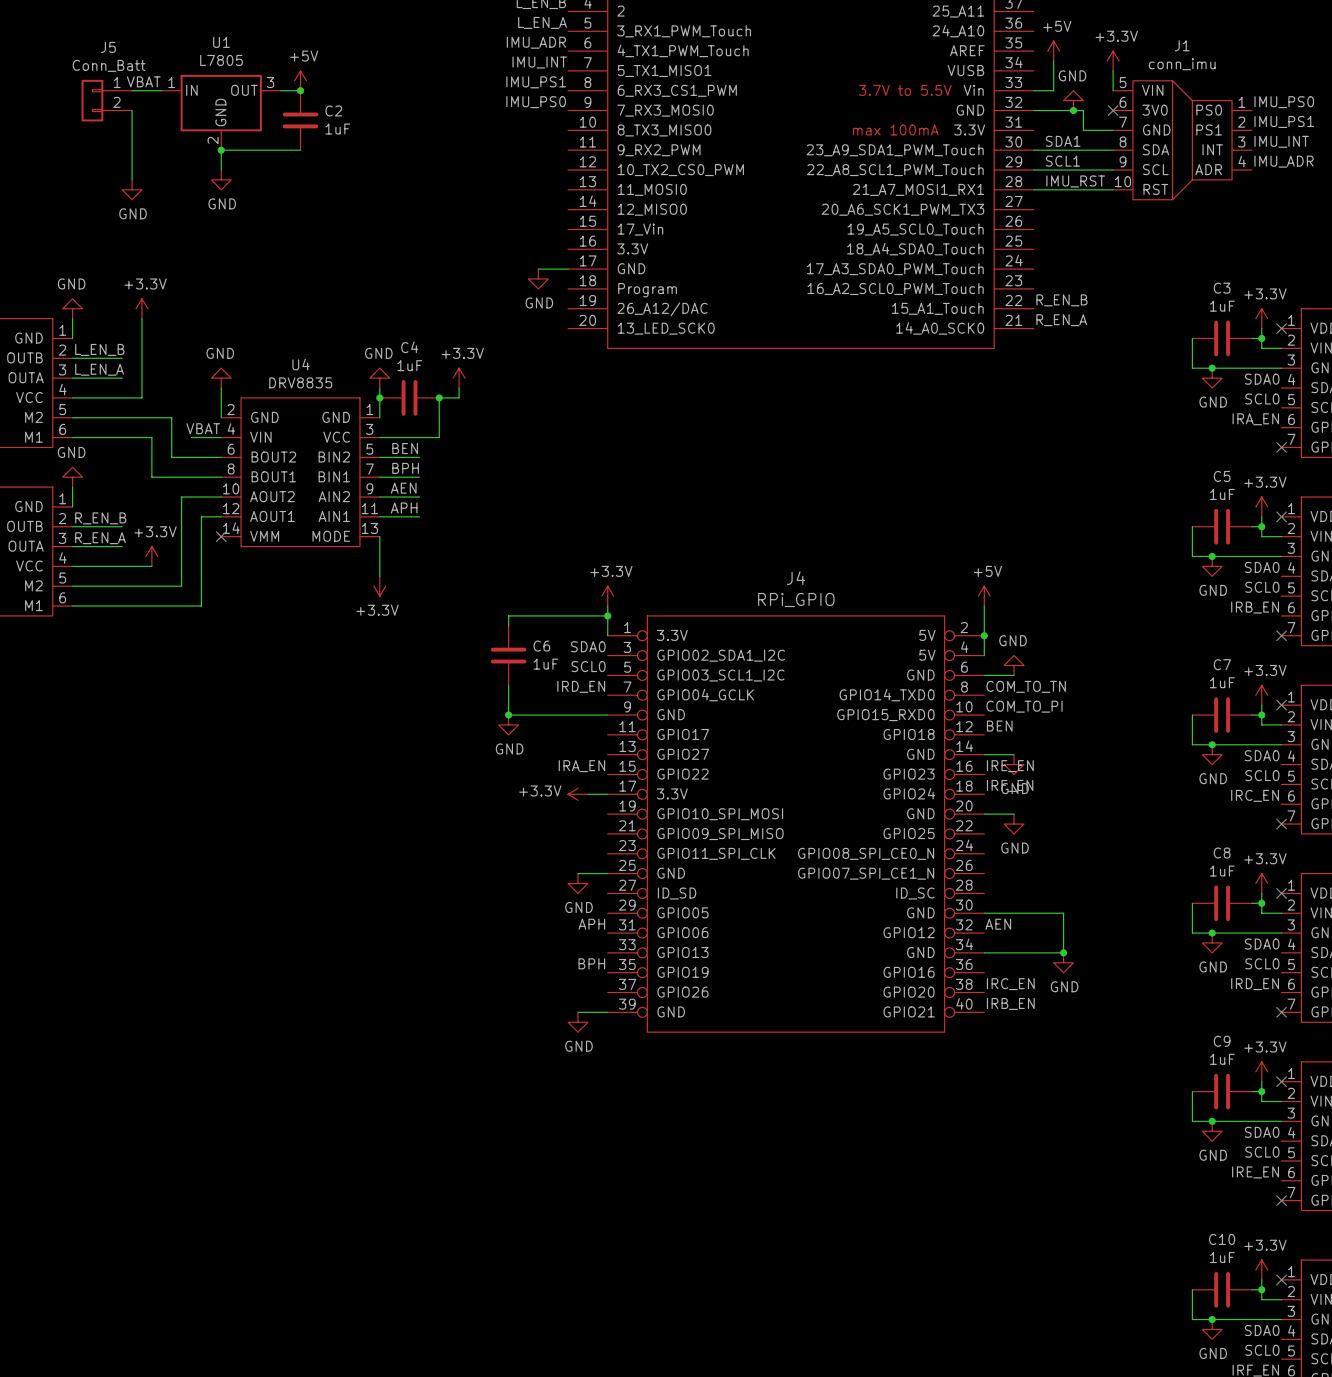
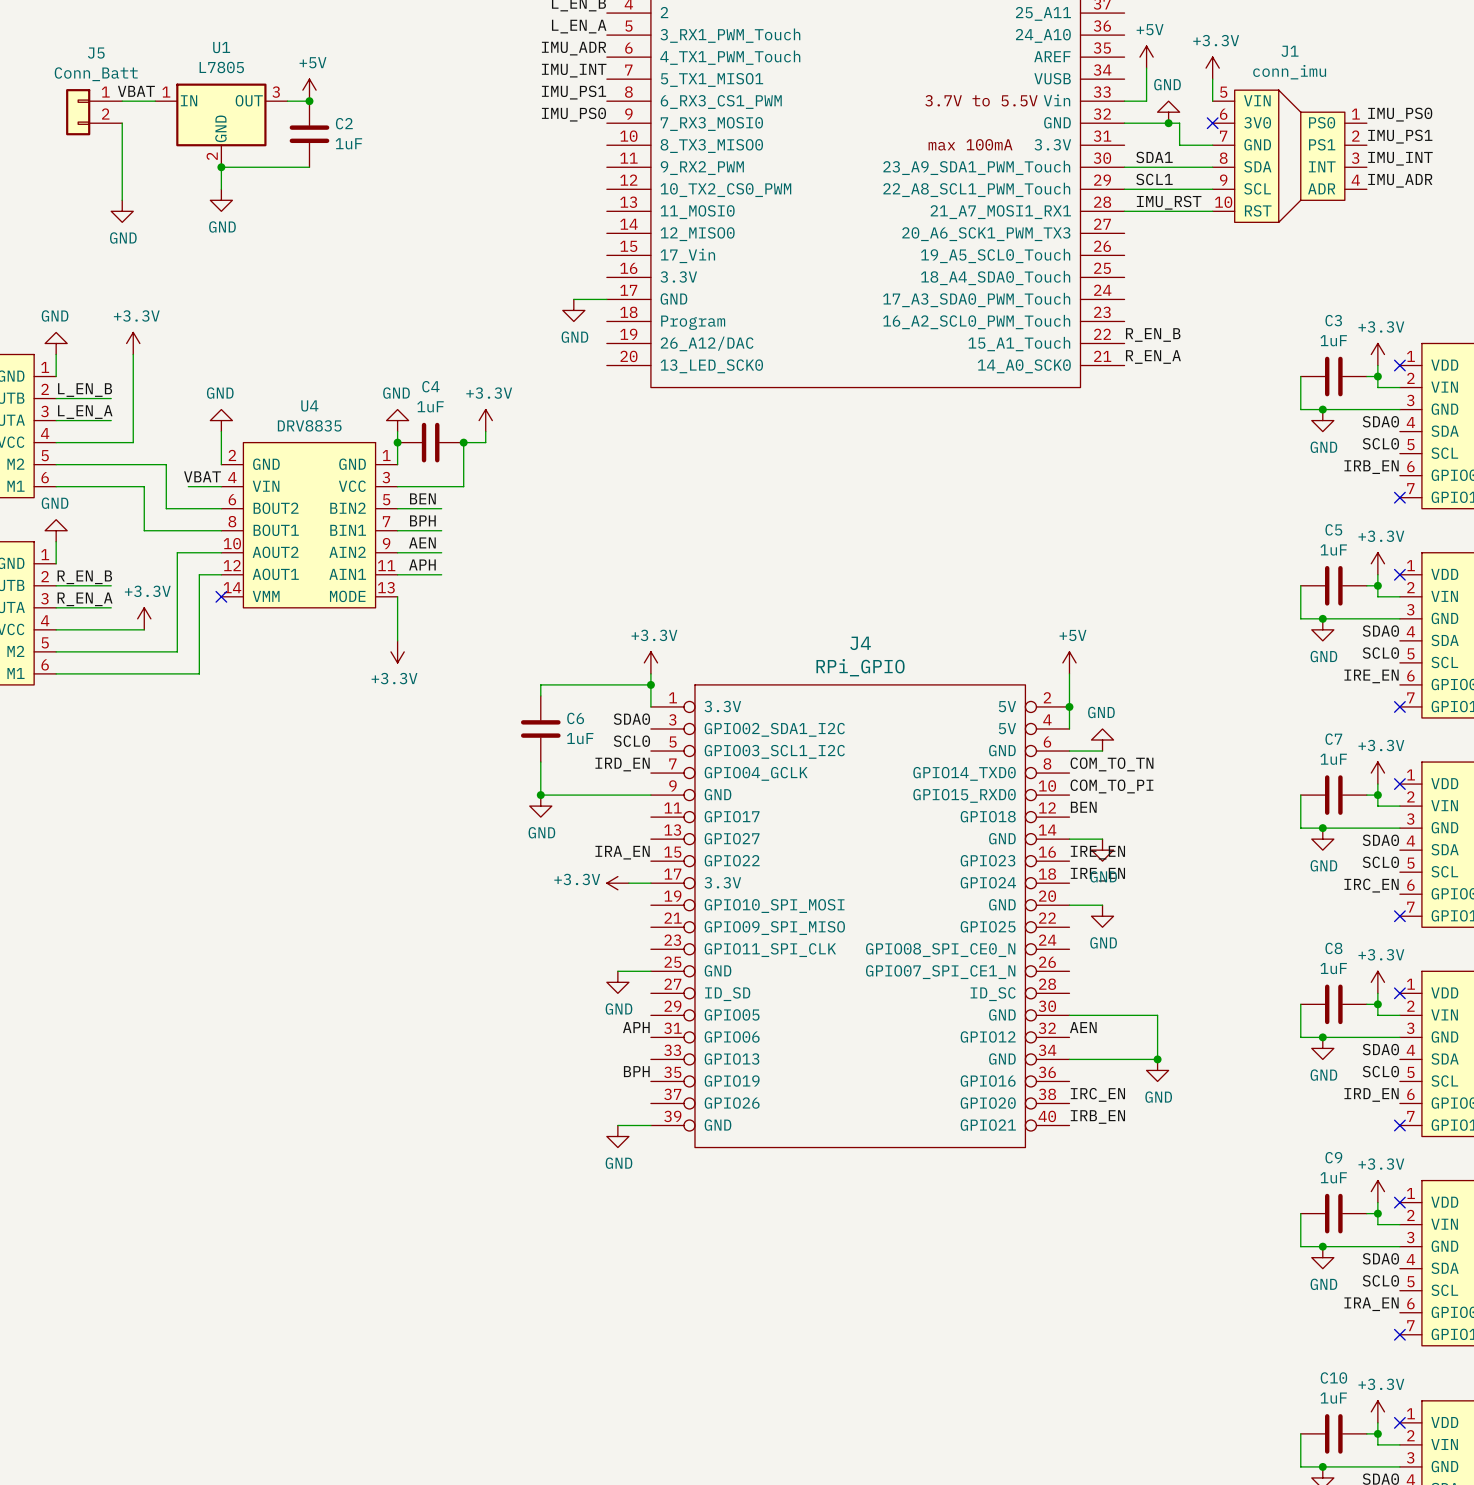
label: IRA_EN (1255, 419) -> IRB_EN (1371, 467)
label: IRB_EN (1255, 607) -> IRE_EN (1371, 676)
label: IRE_EN (1255, 1172) -> IRA_EN (1371, 1304)

